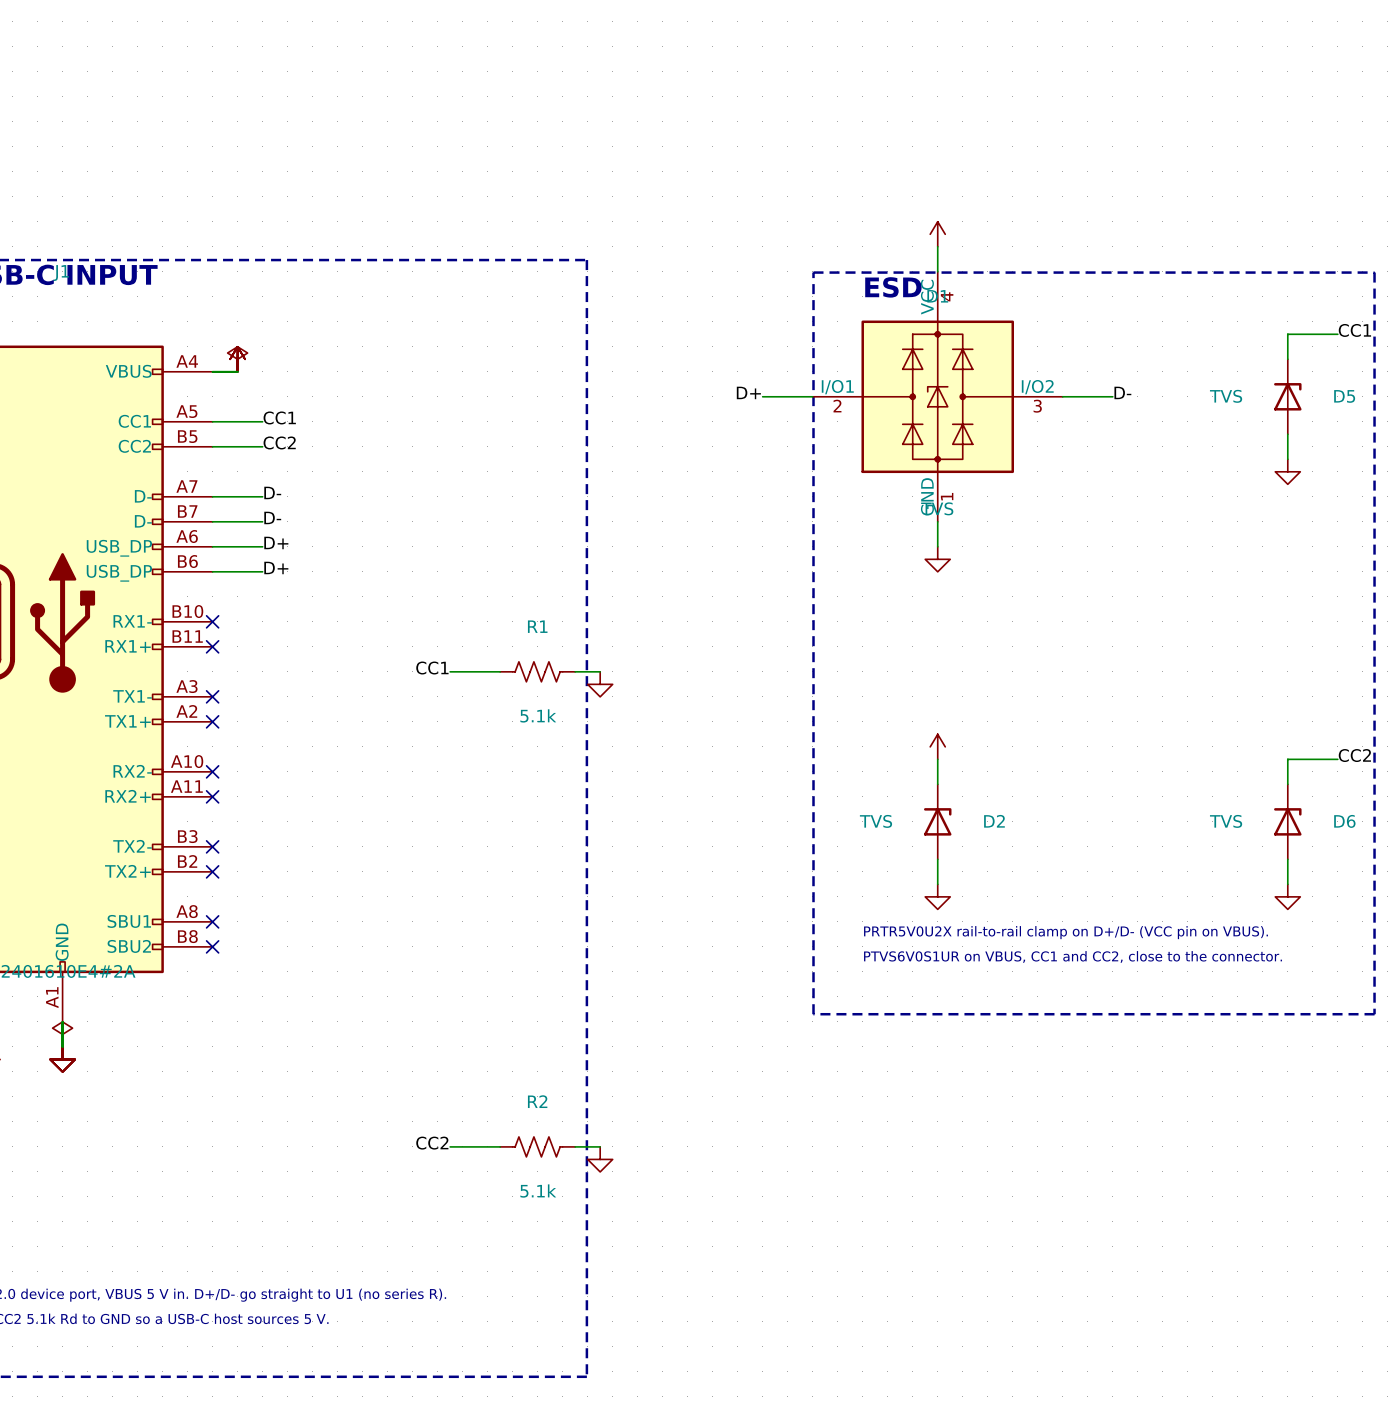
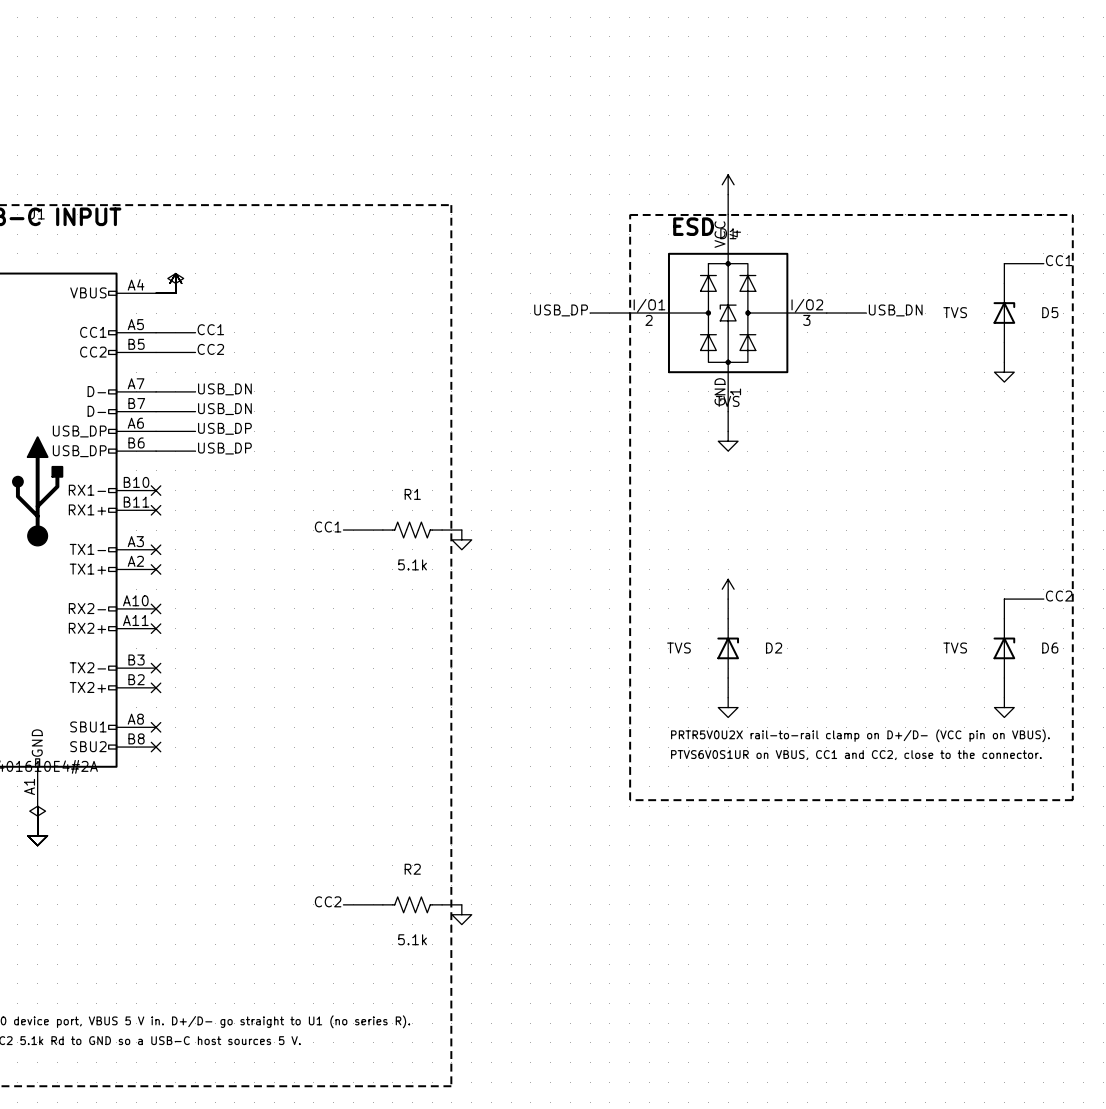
label: D+ (748, 392) -> USB_DP (561, 310)
label: D- (1122, 392) -> USB_DN (895, 310)
label: D- (272, 492) -> USB_DN (224, 389)
label: D- (272, 517) -> USB_DN (224, 409)
label: D+ (276, 542) -> USB_DP (224, 428)
label: D+ (276, 567) -> USB_DP (224, 448)

